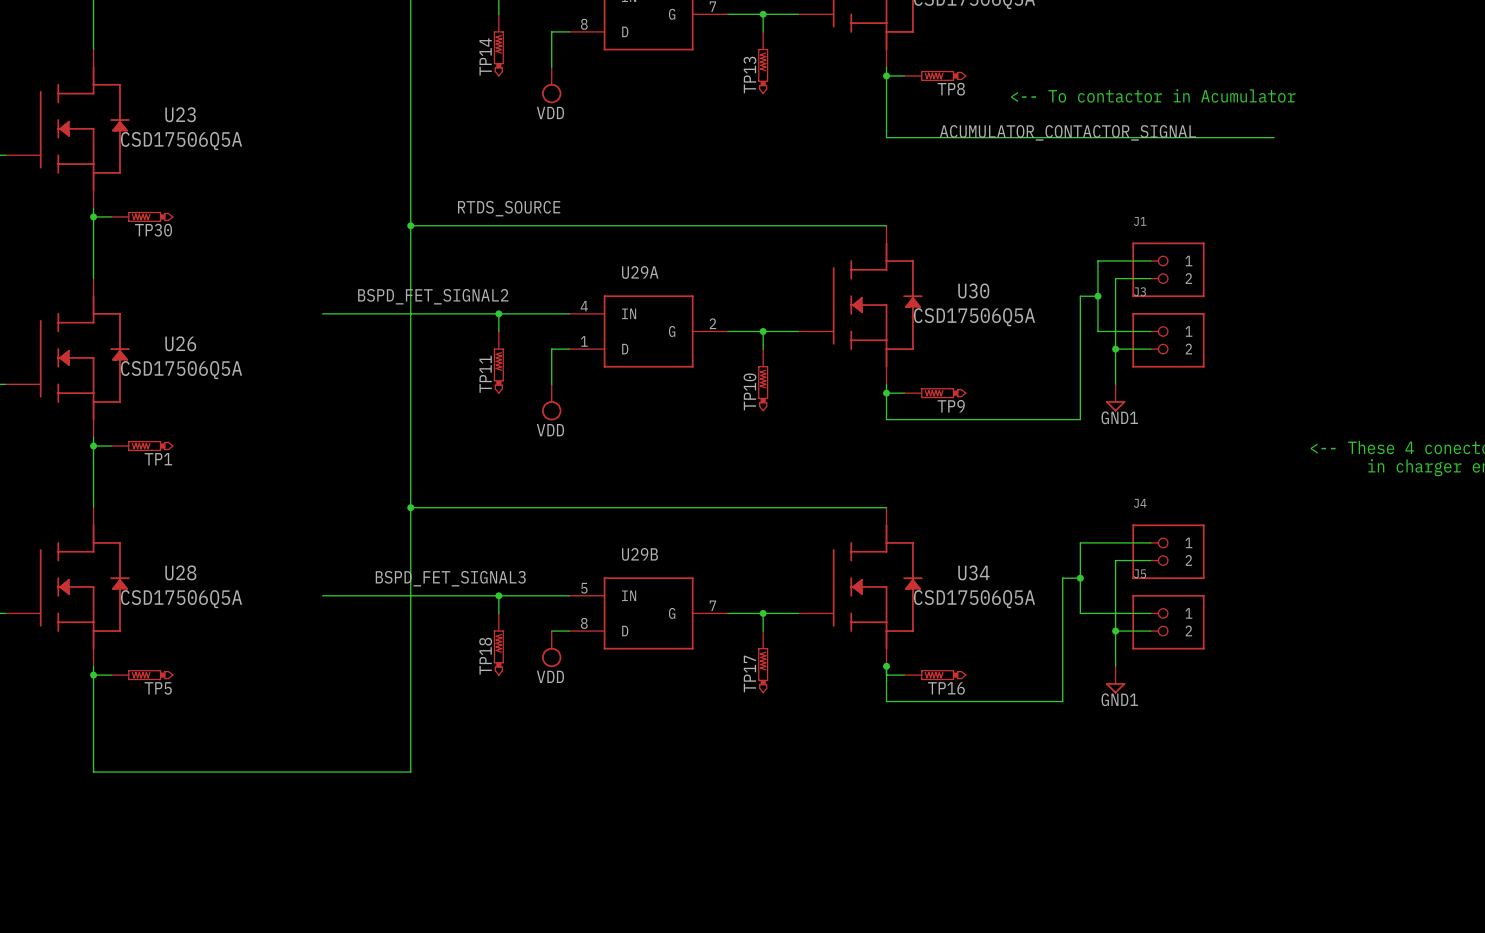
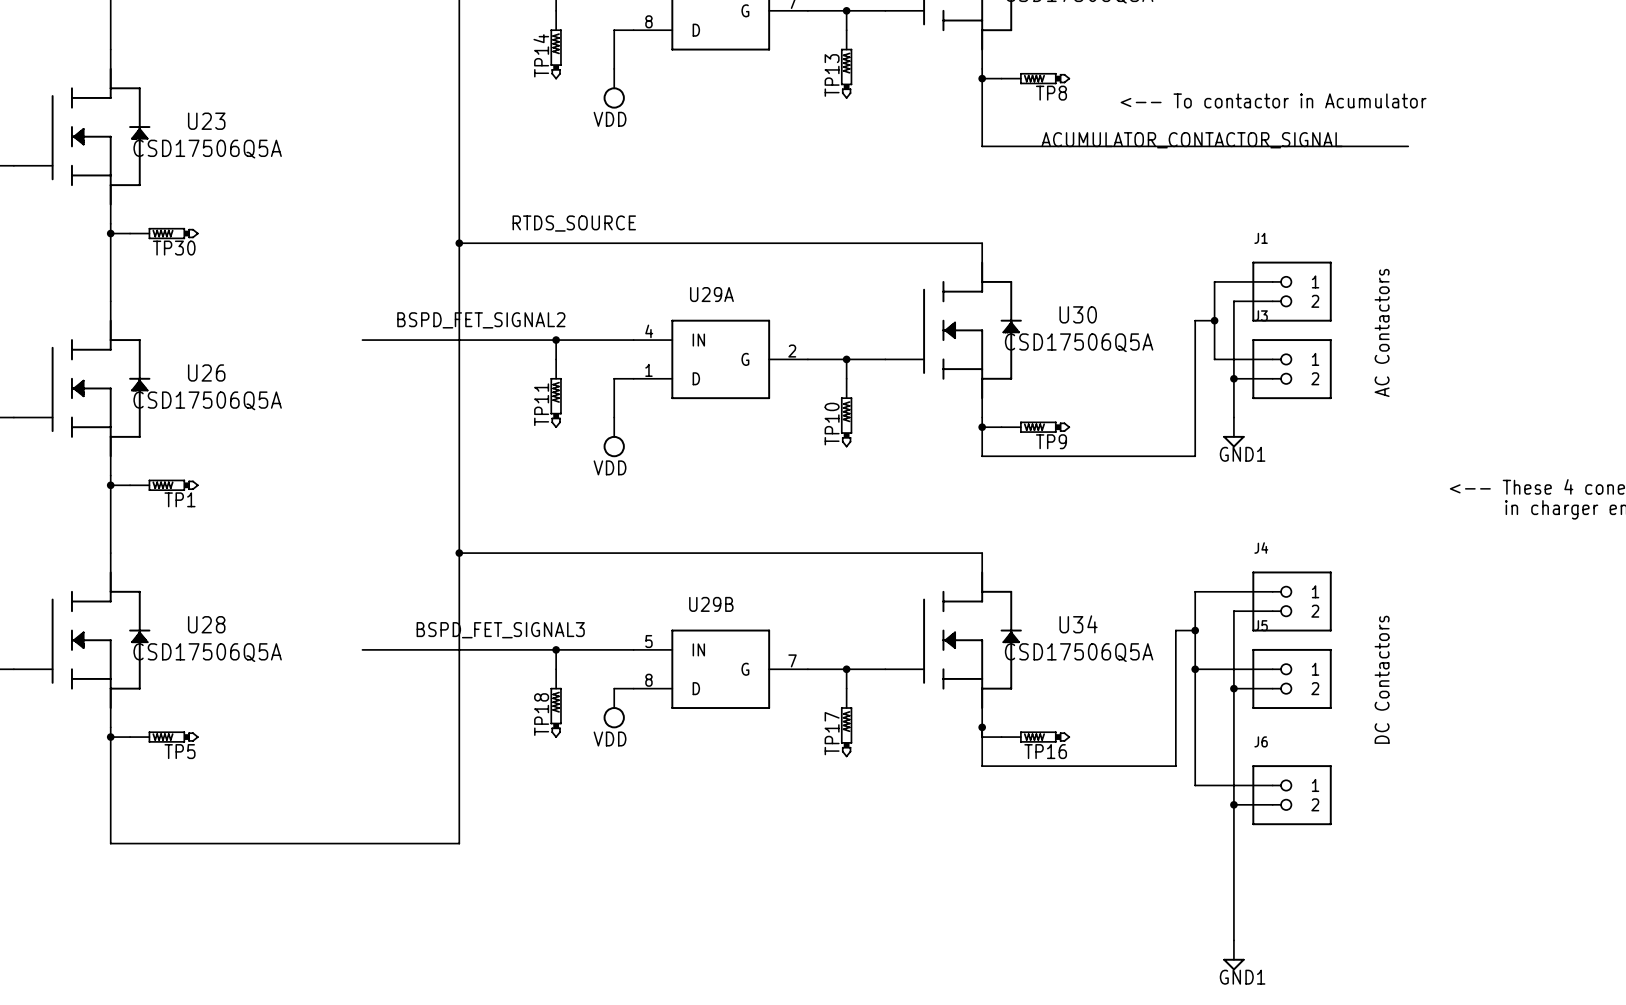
text: none -> AC Contactors (1382, 332)
wire: none -> (1195, 669) (1195, 785) (1272, 785)
junction: none -> (1195, 669)
text: none -> DC Contactors (1382, 679)
wire: none -> (1233, 727) (1233, 940)
power symbol: GND1 (1115, 679) -> none
J6: none -> (1292, 795)
wire: none -> (1233, 804) (1272, 804)
junction: none -> (1233, 804)
power symbol: none -> GND1 (1233, 955)

